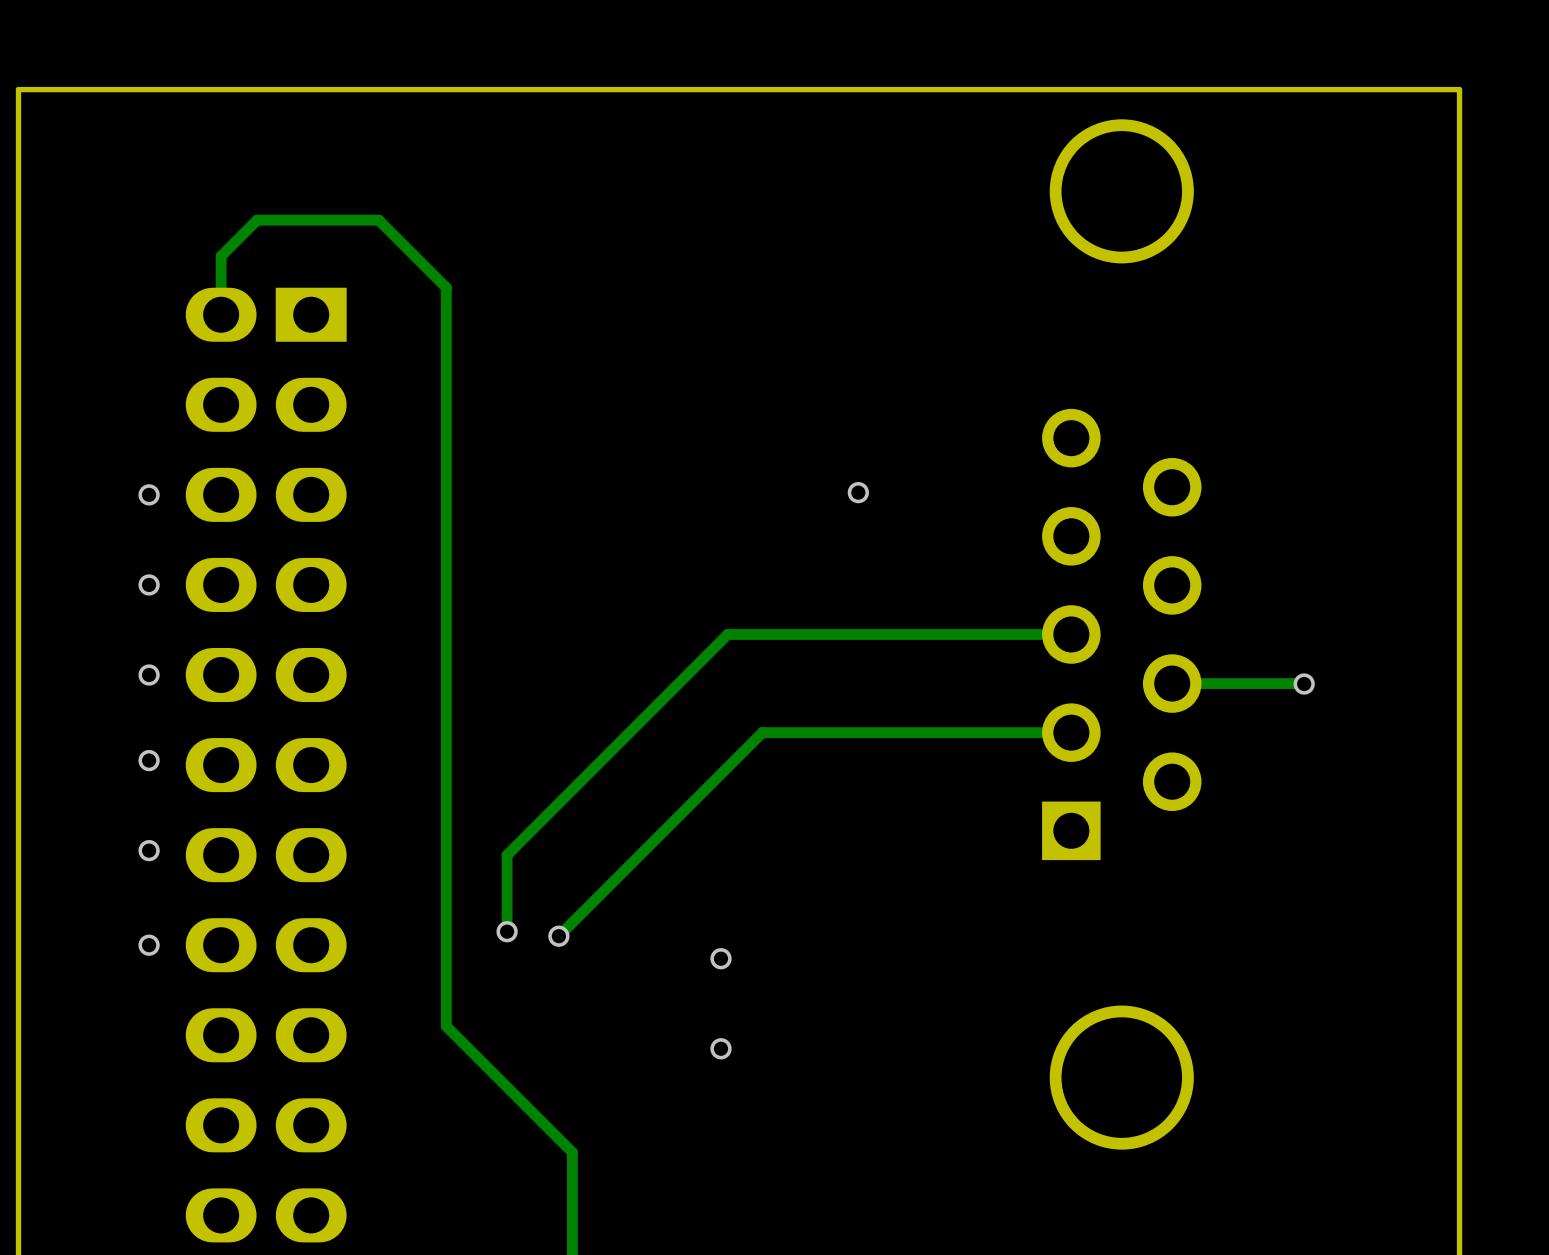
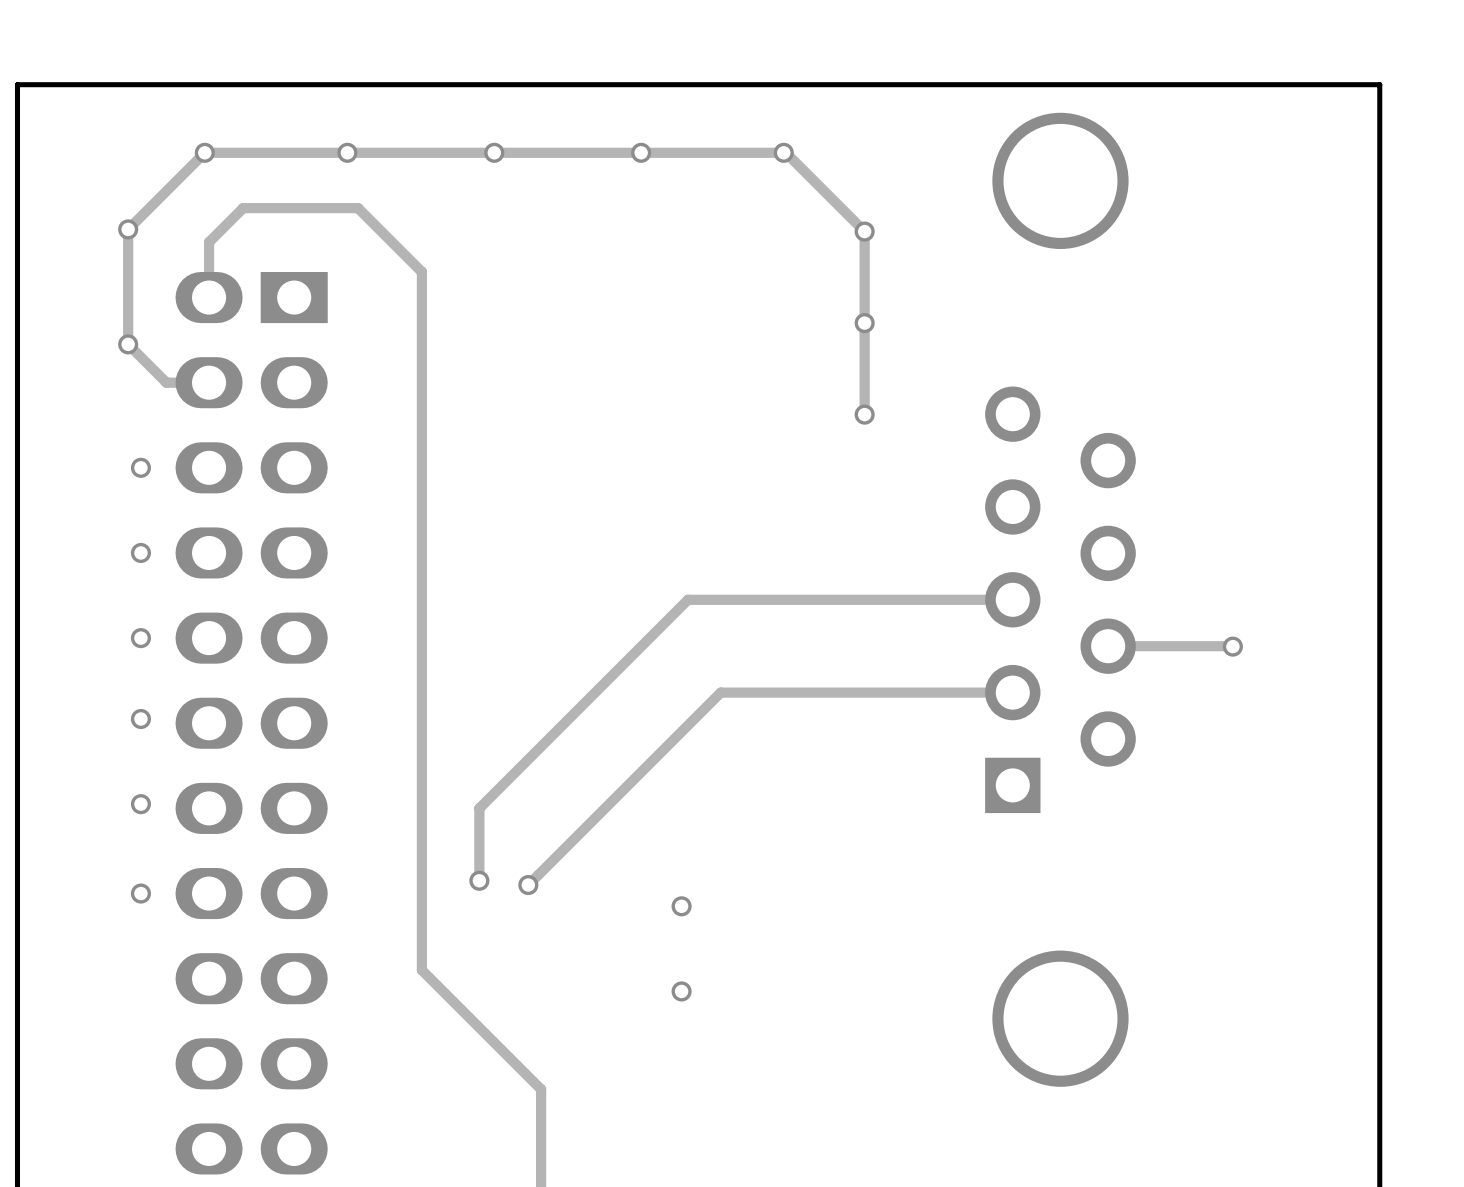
via: none -> (204, 152)
via: none -> (347, 152)
via: none -> (494, 152)
via: none -> (641, 152)
via: none -> (783, 152)
via: none -> (128, 229)
via: none -> (864, 231)
via: none -> (864, 323)
via: none -> (128, 344)
track: none -> (209, 382) (166, 382) (128, 344) (128, 229) (204, 152) (785, 152) (864, 231) (864, 414)
via position: (858, 492) -> (864, 414)

